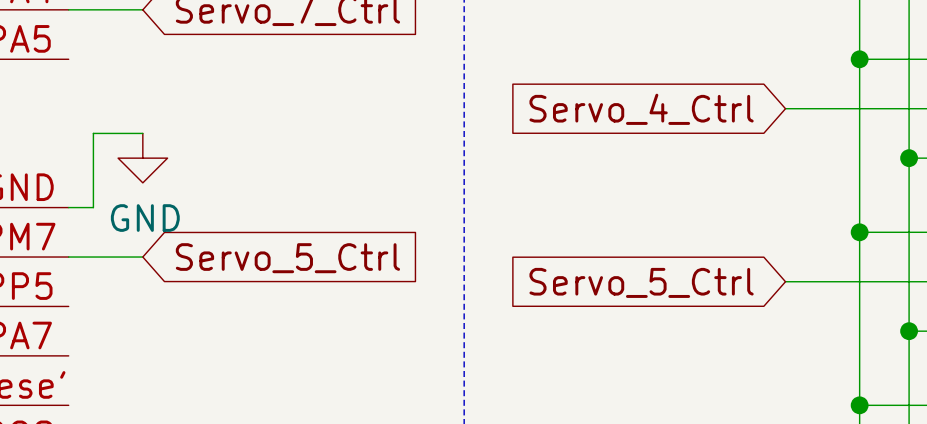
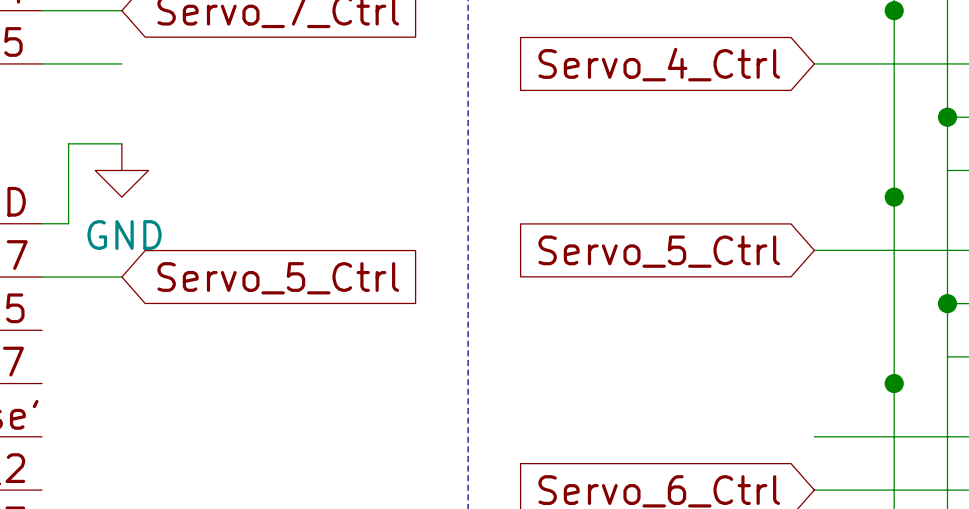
junction: none -> (894, 10)
wire: none -> (41, 63) (121, 63)
wire: none -> (814, 63) (894, 63)
junction: (859, 59) -> none
wire: (785, 108) (909, 108) -> none
junction: none -> (947, 117)
global label position: Servo_4_Ctrl (641, 109) -> Servo_4_Ctrl (659, 64)
junction: (909, 158) -> none
junction: none -> (894, 197)
wire: none -> (814, 250) (894, 250)
junction: (859, 232) -> none
wire: (785, 281) (909, 281) -> none
junction: none -> (947, 303)
global label position: Servo_5_Ctrl (641, 282) -> Servo_5_Ctrl (659, 251)
junction: (909, 331) -> none
junction: none -> (894, 383)
wire: none -> (814, 436) (894, 436)
junction: (859, 405) -> none

